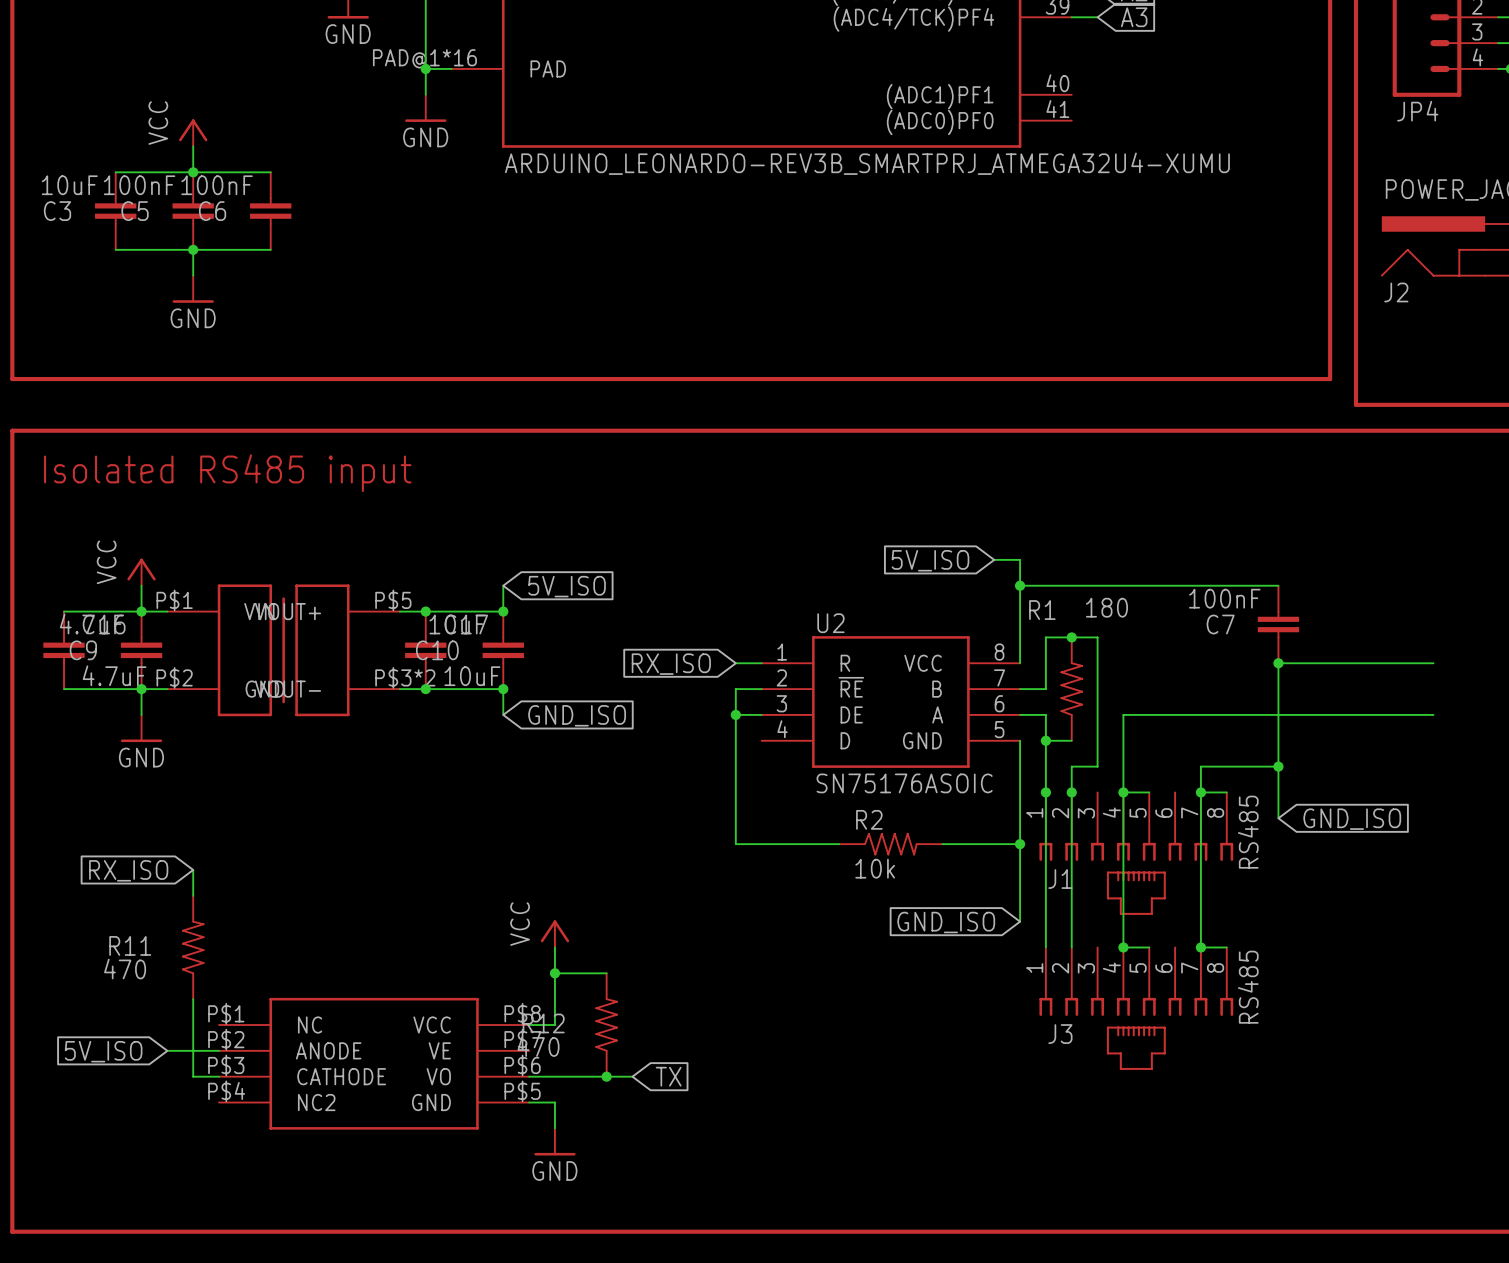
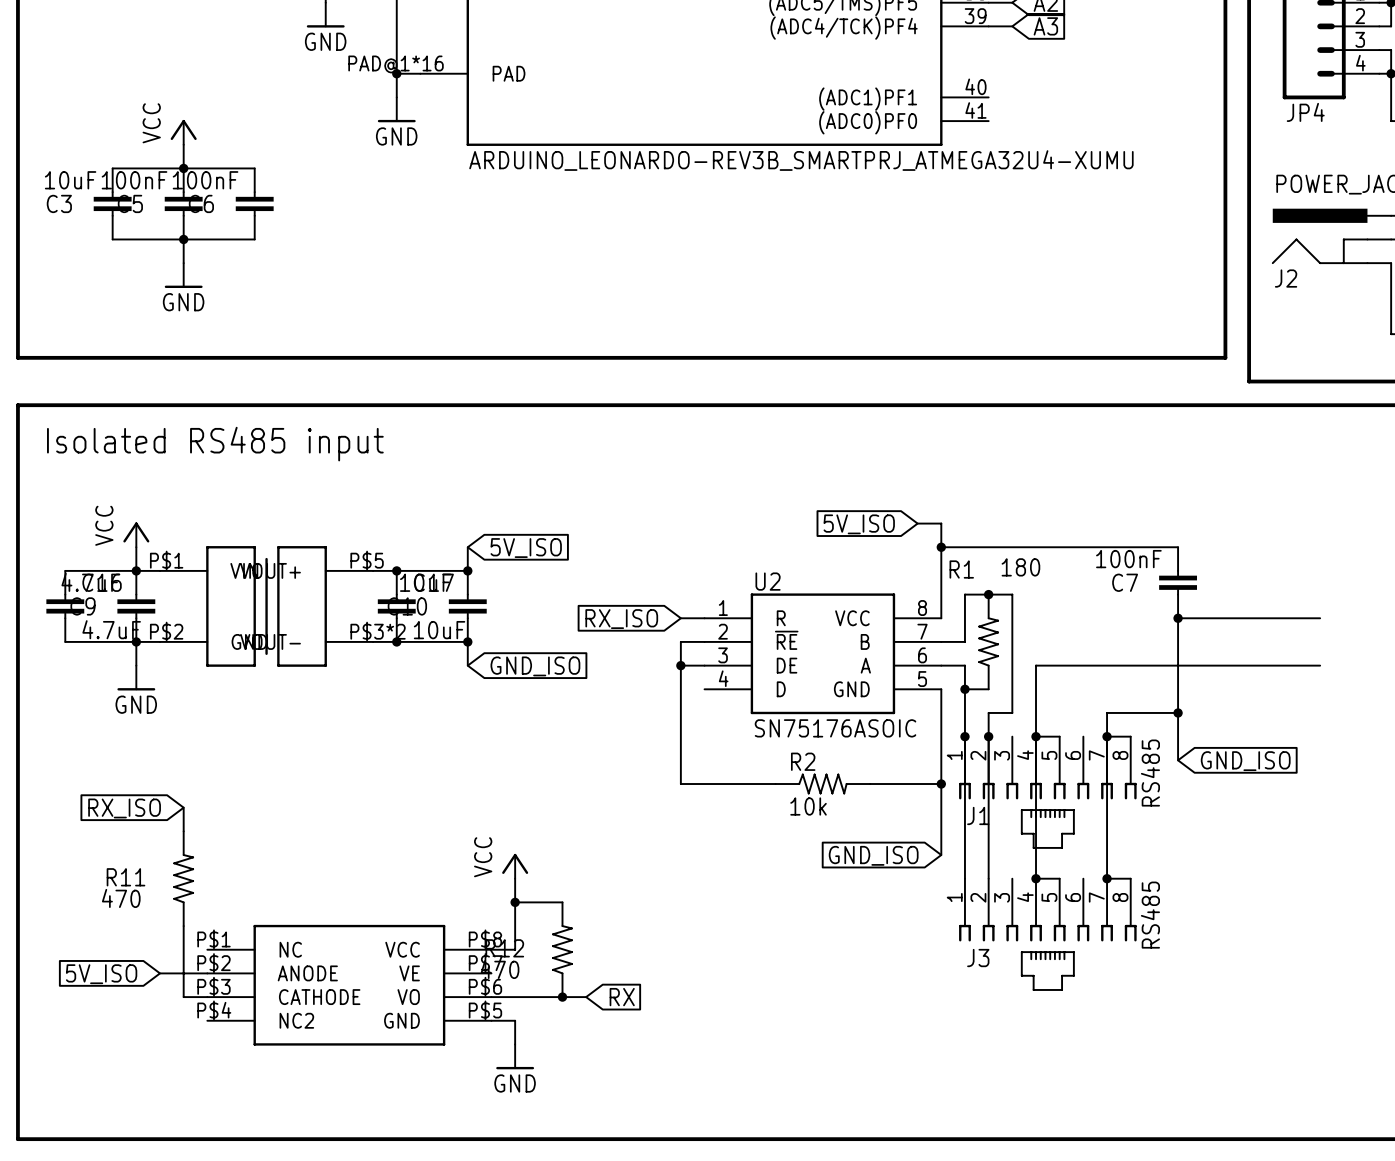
global label: TX (668, 1076) -> RX (622, 997)

